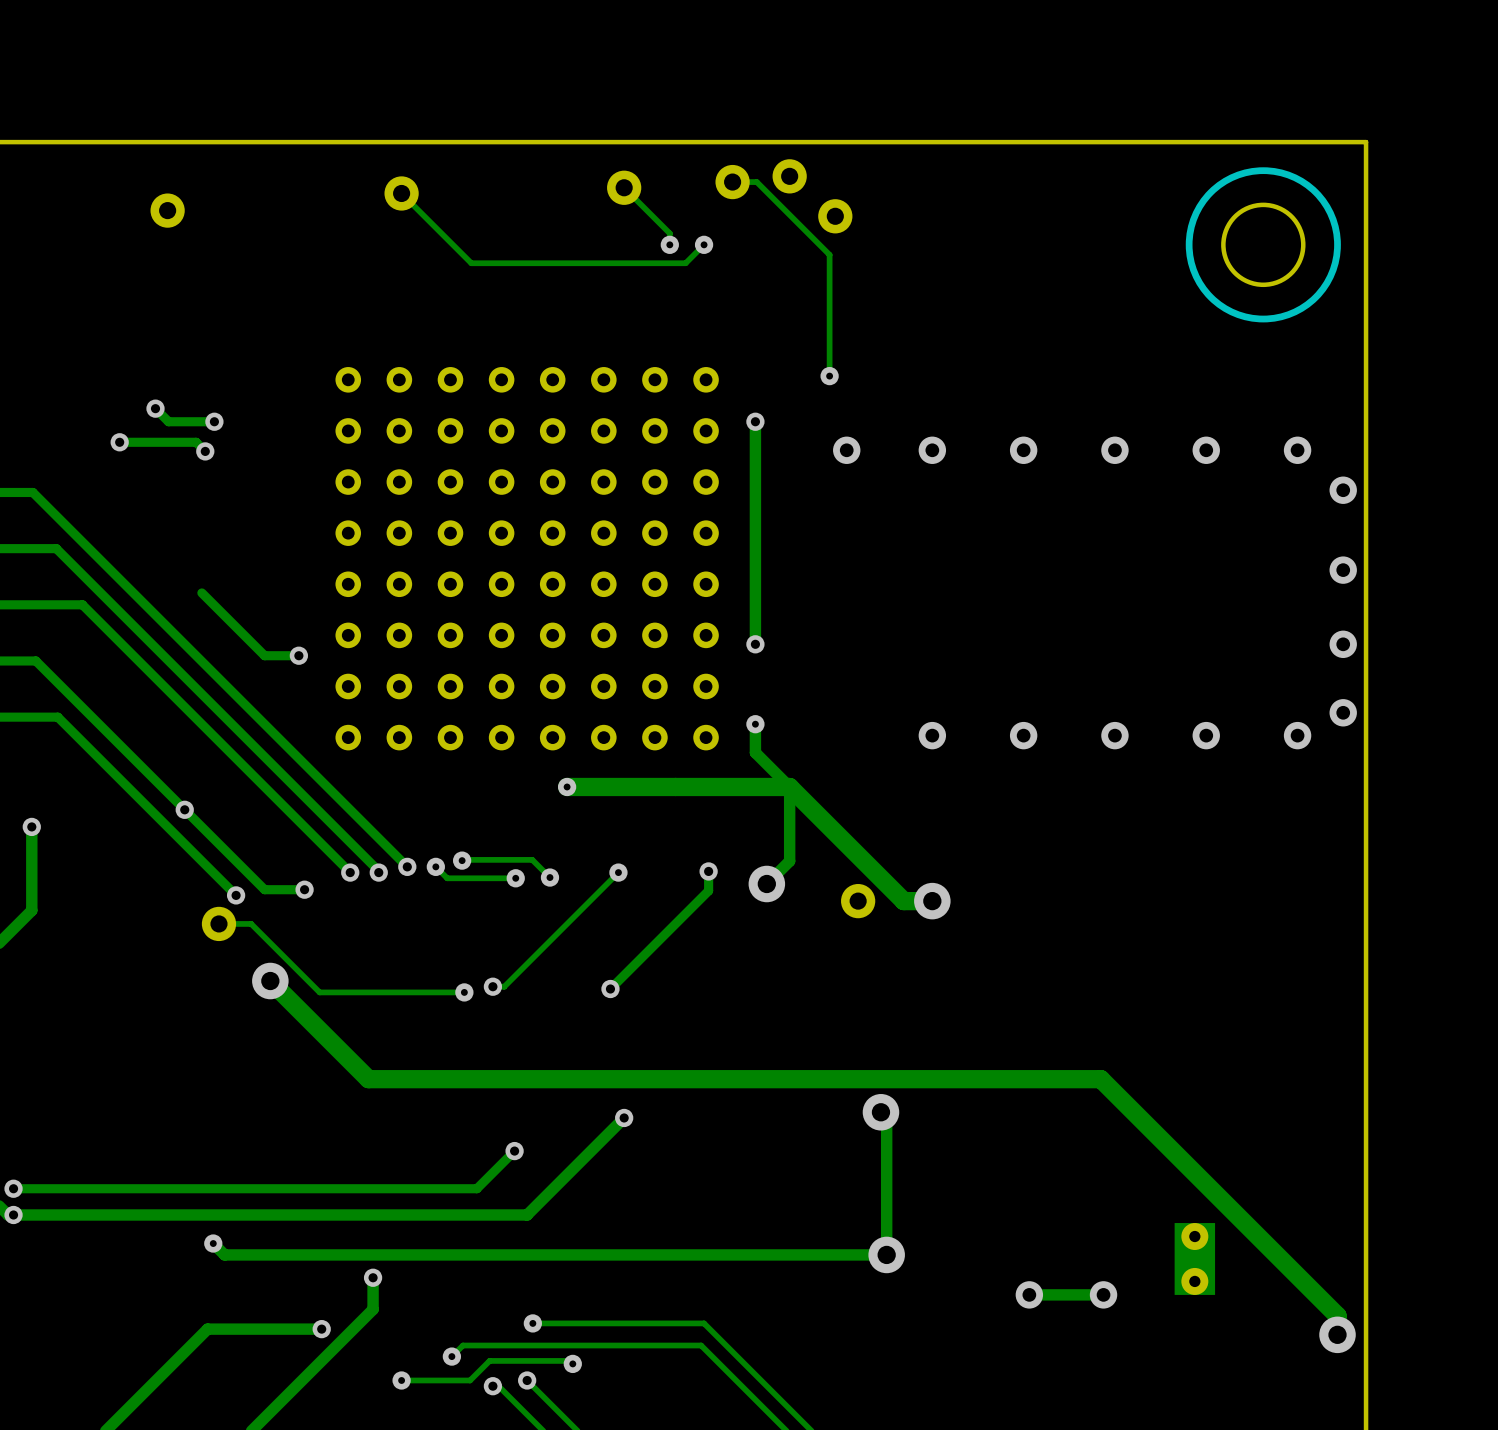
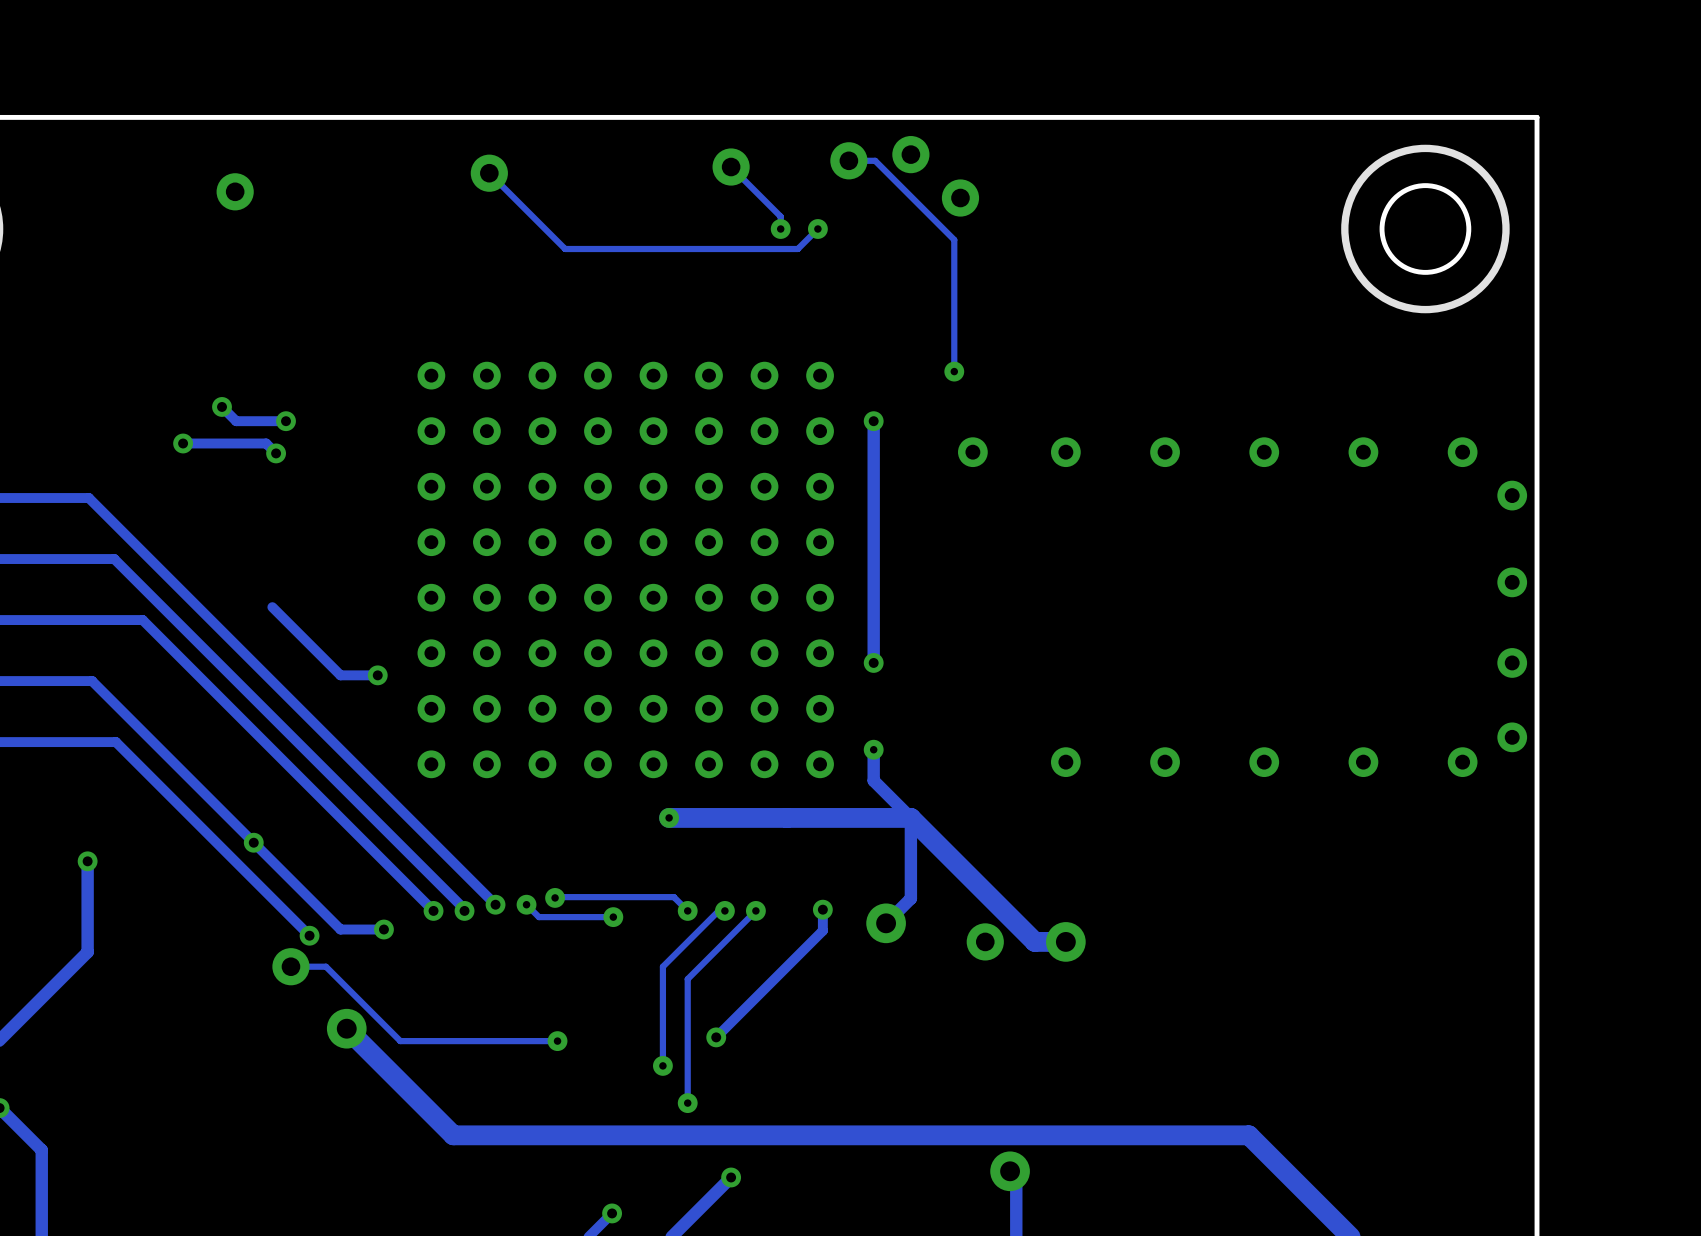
track: (532, 859) (549, 877) -> (631, 897) (673, 897) (687, 910)
track: none -> (718, 910) (662, 966) (662, 1065)
track: (618, 872) (504, 986) (492, 986) -> none
track: none -> (755, 910) (687, 979) (687, 1103)
via: none -> (755, 910)
via position: (549, 877) -> (687, 910)
via: (492, 986) -> none
via: none -> (662, 1065)
via: none -> (687, 1103)

